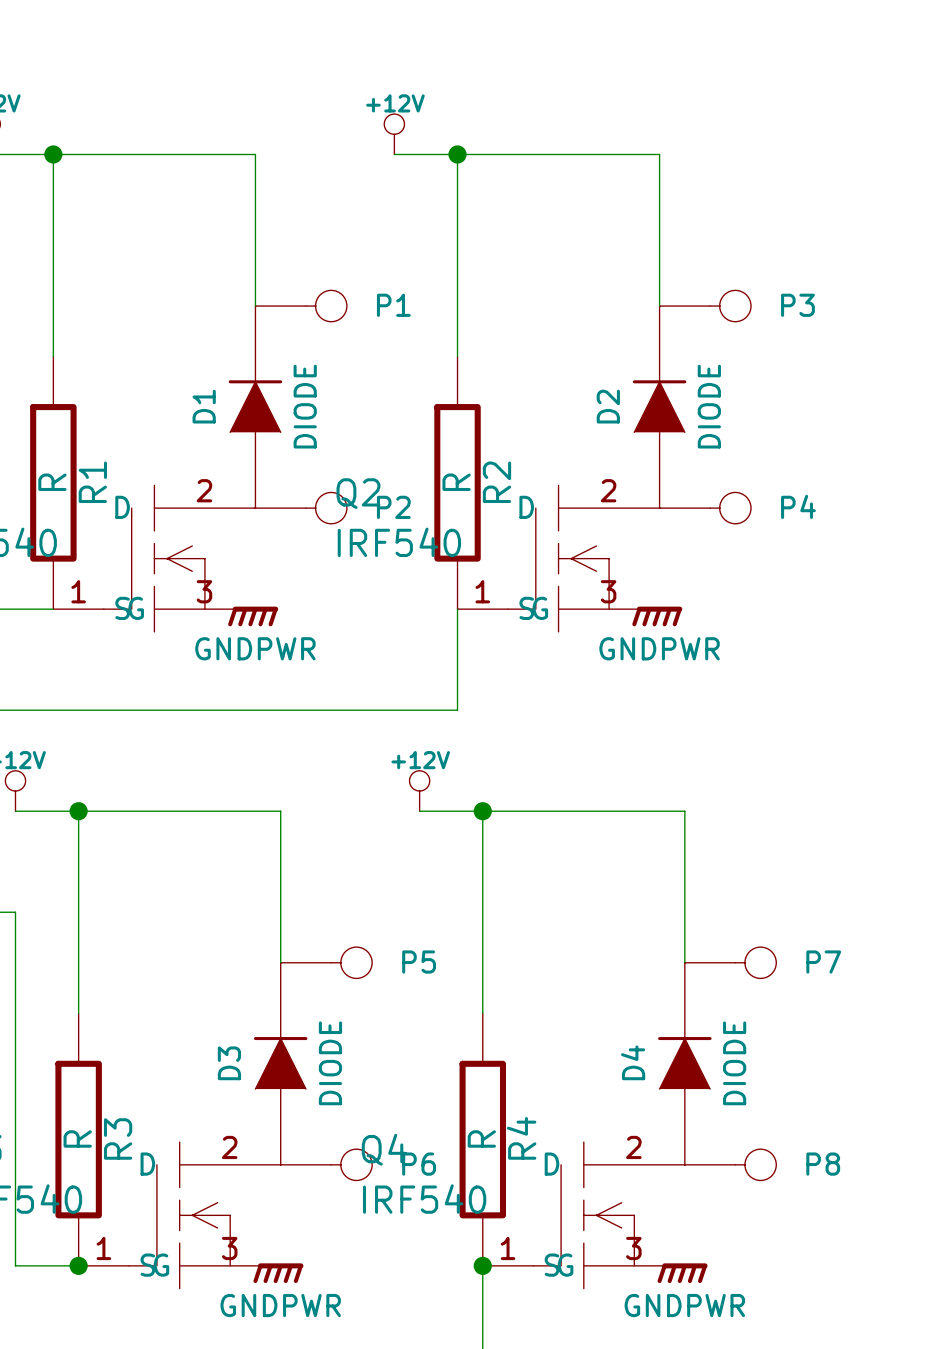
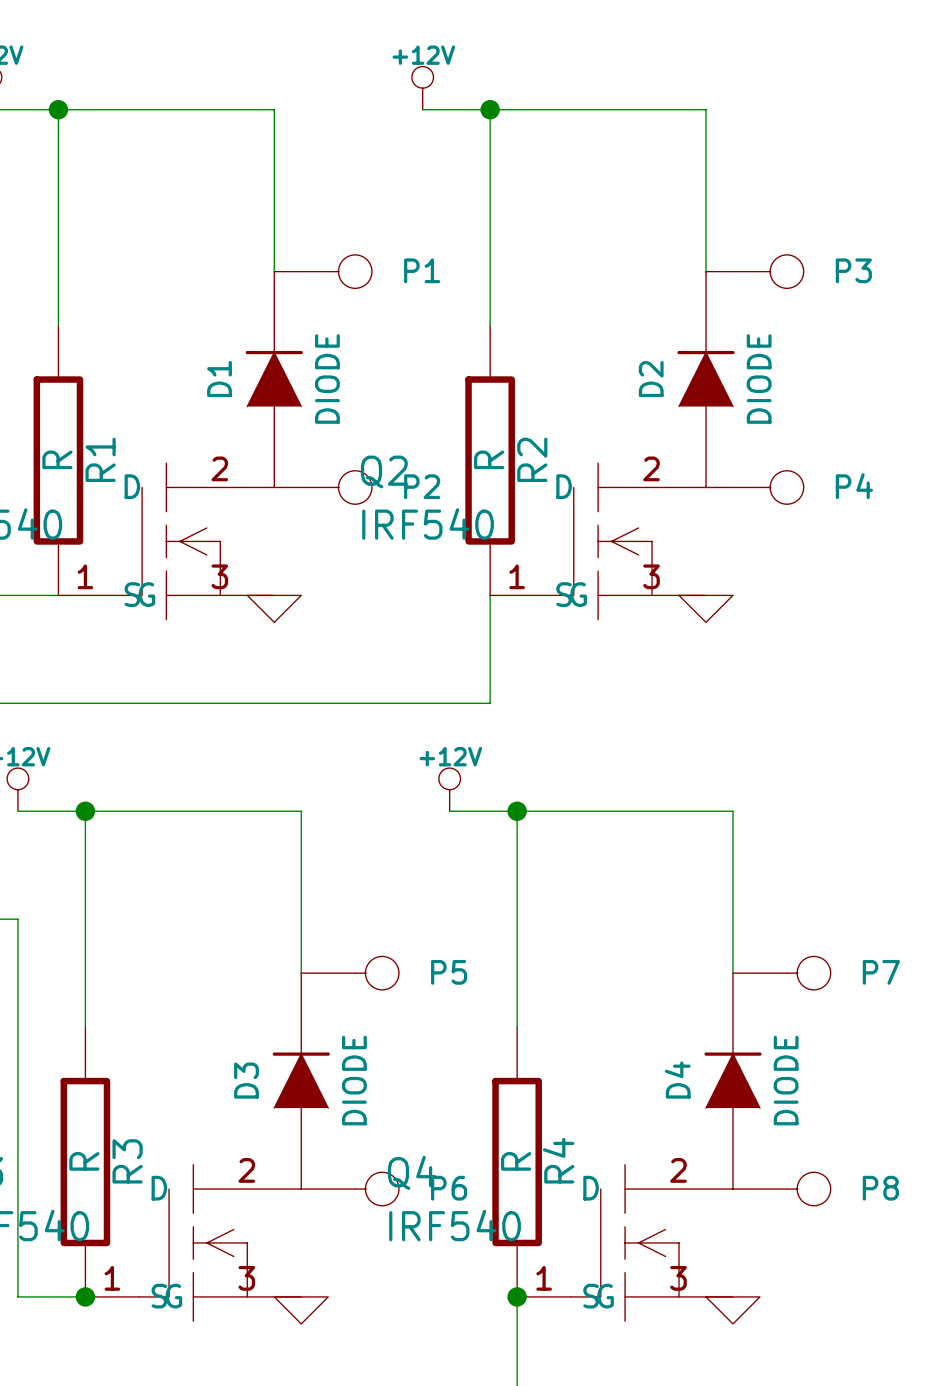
power symbol shape: [228, 606, 279, 627] -> [247, 595, 302, 623]
power symbol shape: [632, 606, 683, 627] -> [679, 595, 733, 623]
power symbol text: GNDPWR (255, 648) -> none
power symbol text: GNDPWR (659, 648) -> none
power symbol shape: [253, 1263, 304, 1284] -> [274, 1296, 329, 1324]
power symbol shape: [657, 1263, 708, 1284] -> [705, 1296, 760, 1324]
power symbol text: GNDPWR (280, 1305) -> none
power symbol text: GNDPWR (684, 1305) -> none

